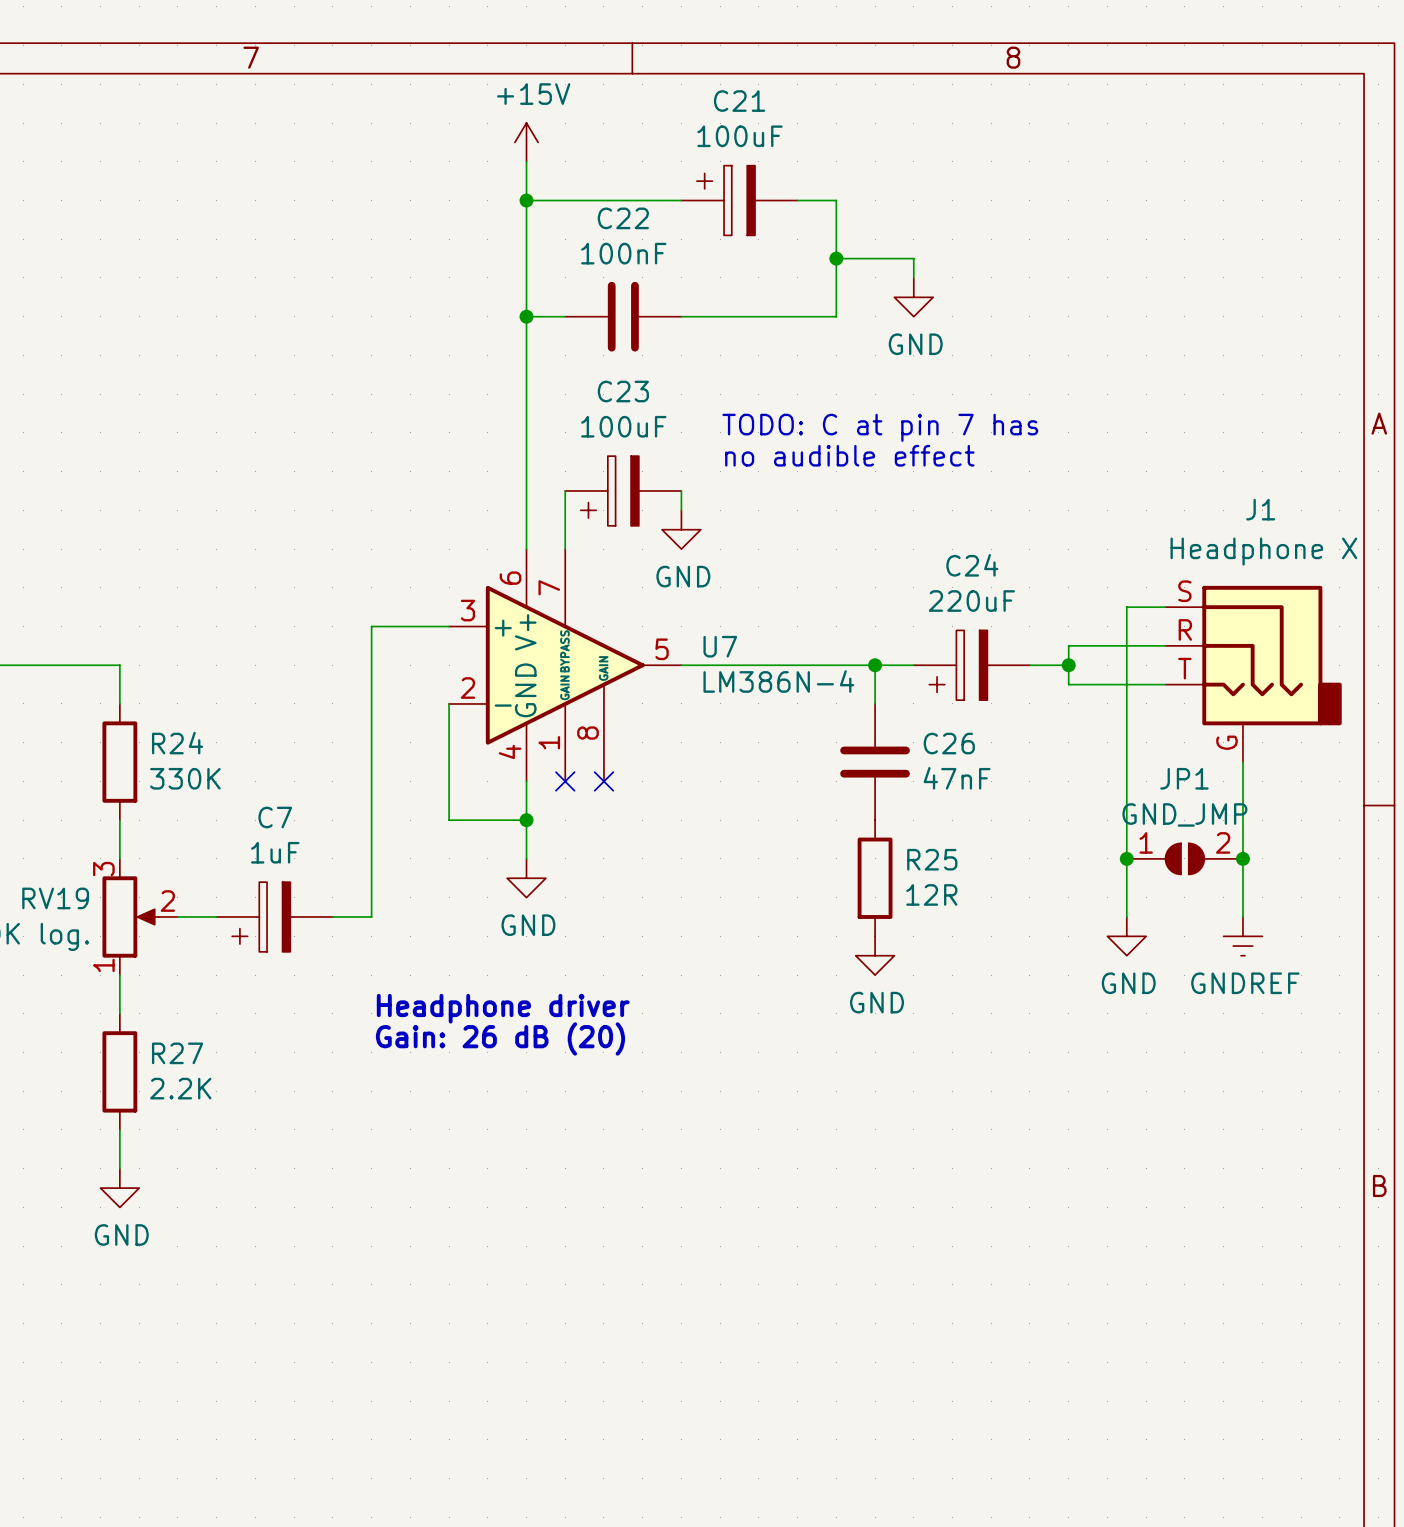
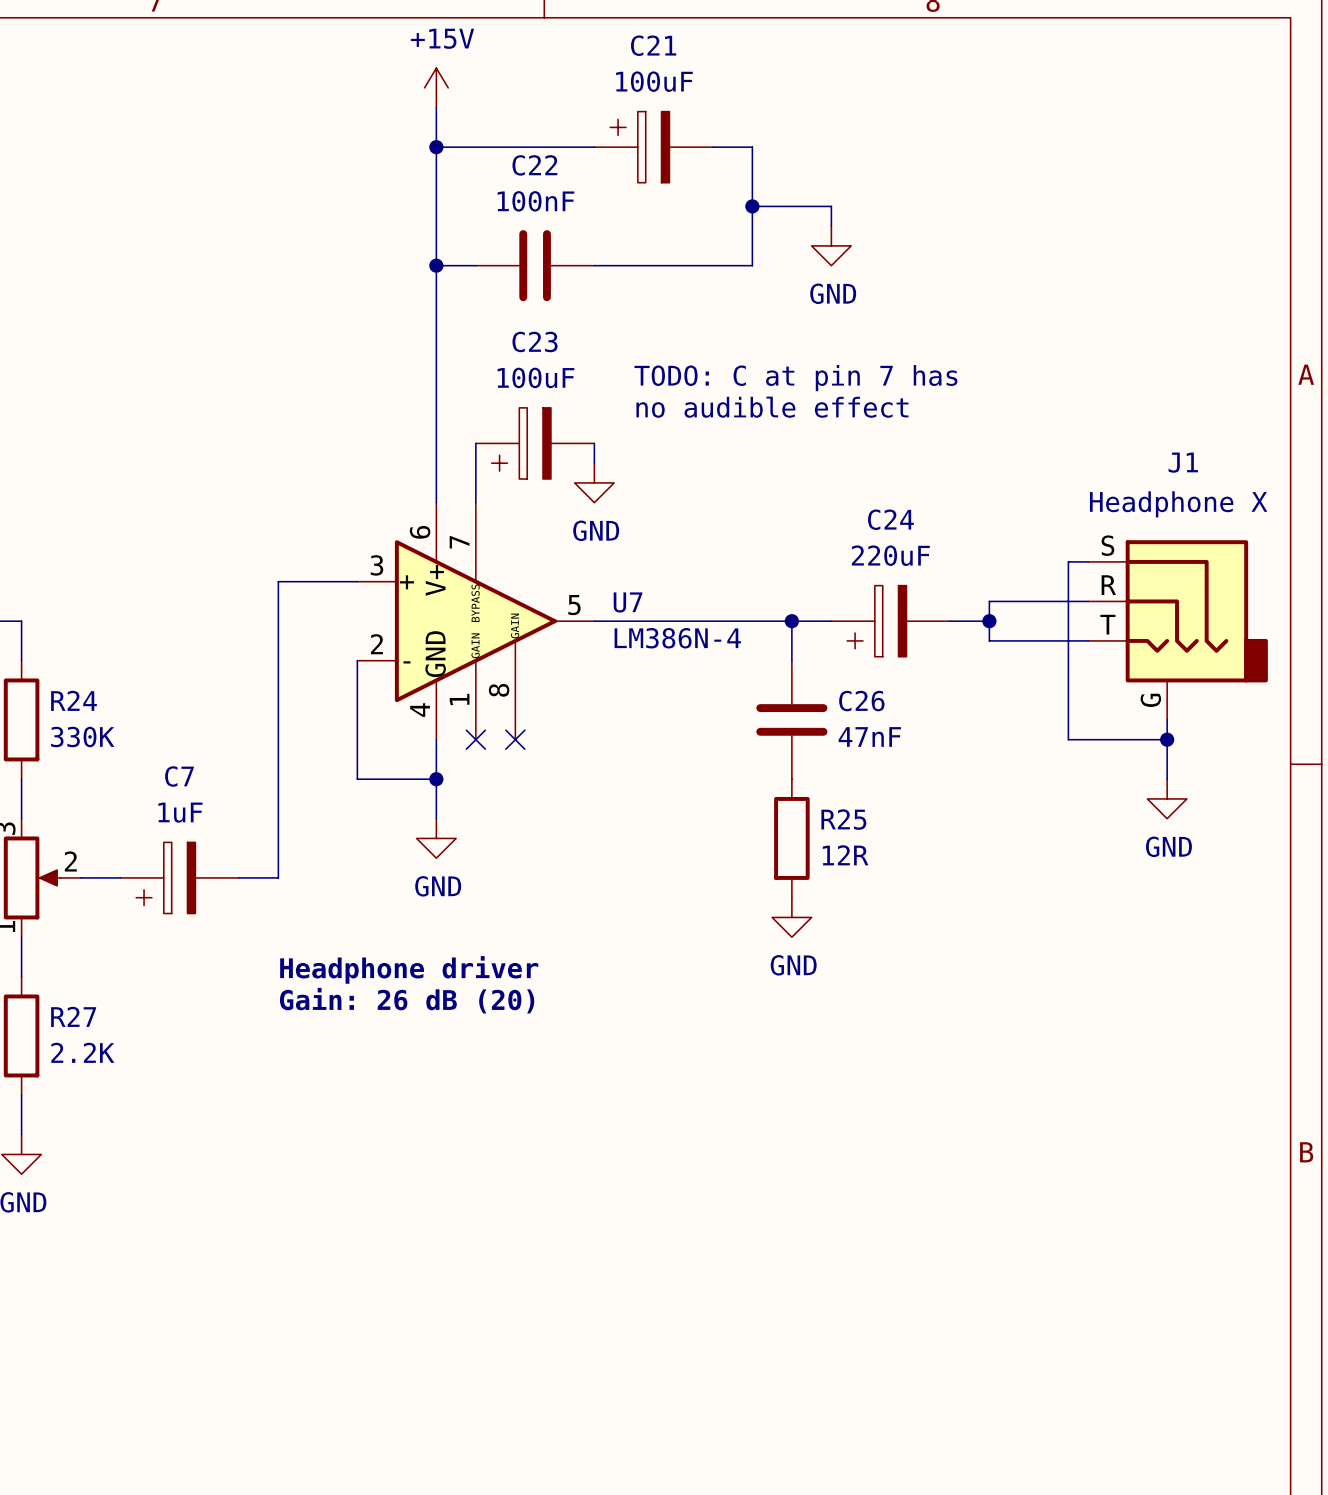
wire: (1146, 607) (1126, 607) (1126, 916) -> (1068, 561) (1068, 739) (1167, 739)
junction: none -> (1167, 739)
wire: (1242, 820) (1242, 916) -> none
junction: (1126, 858) -> none
JP1: GND_JMP (1184, 858) -> none
junction: (1242, 858) -> none
power symbol position: GND (1126, 936) -> GND (1167, 798)
power symbol: GNDREF (1242, 936) -> none

